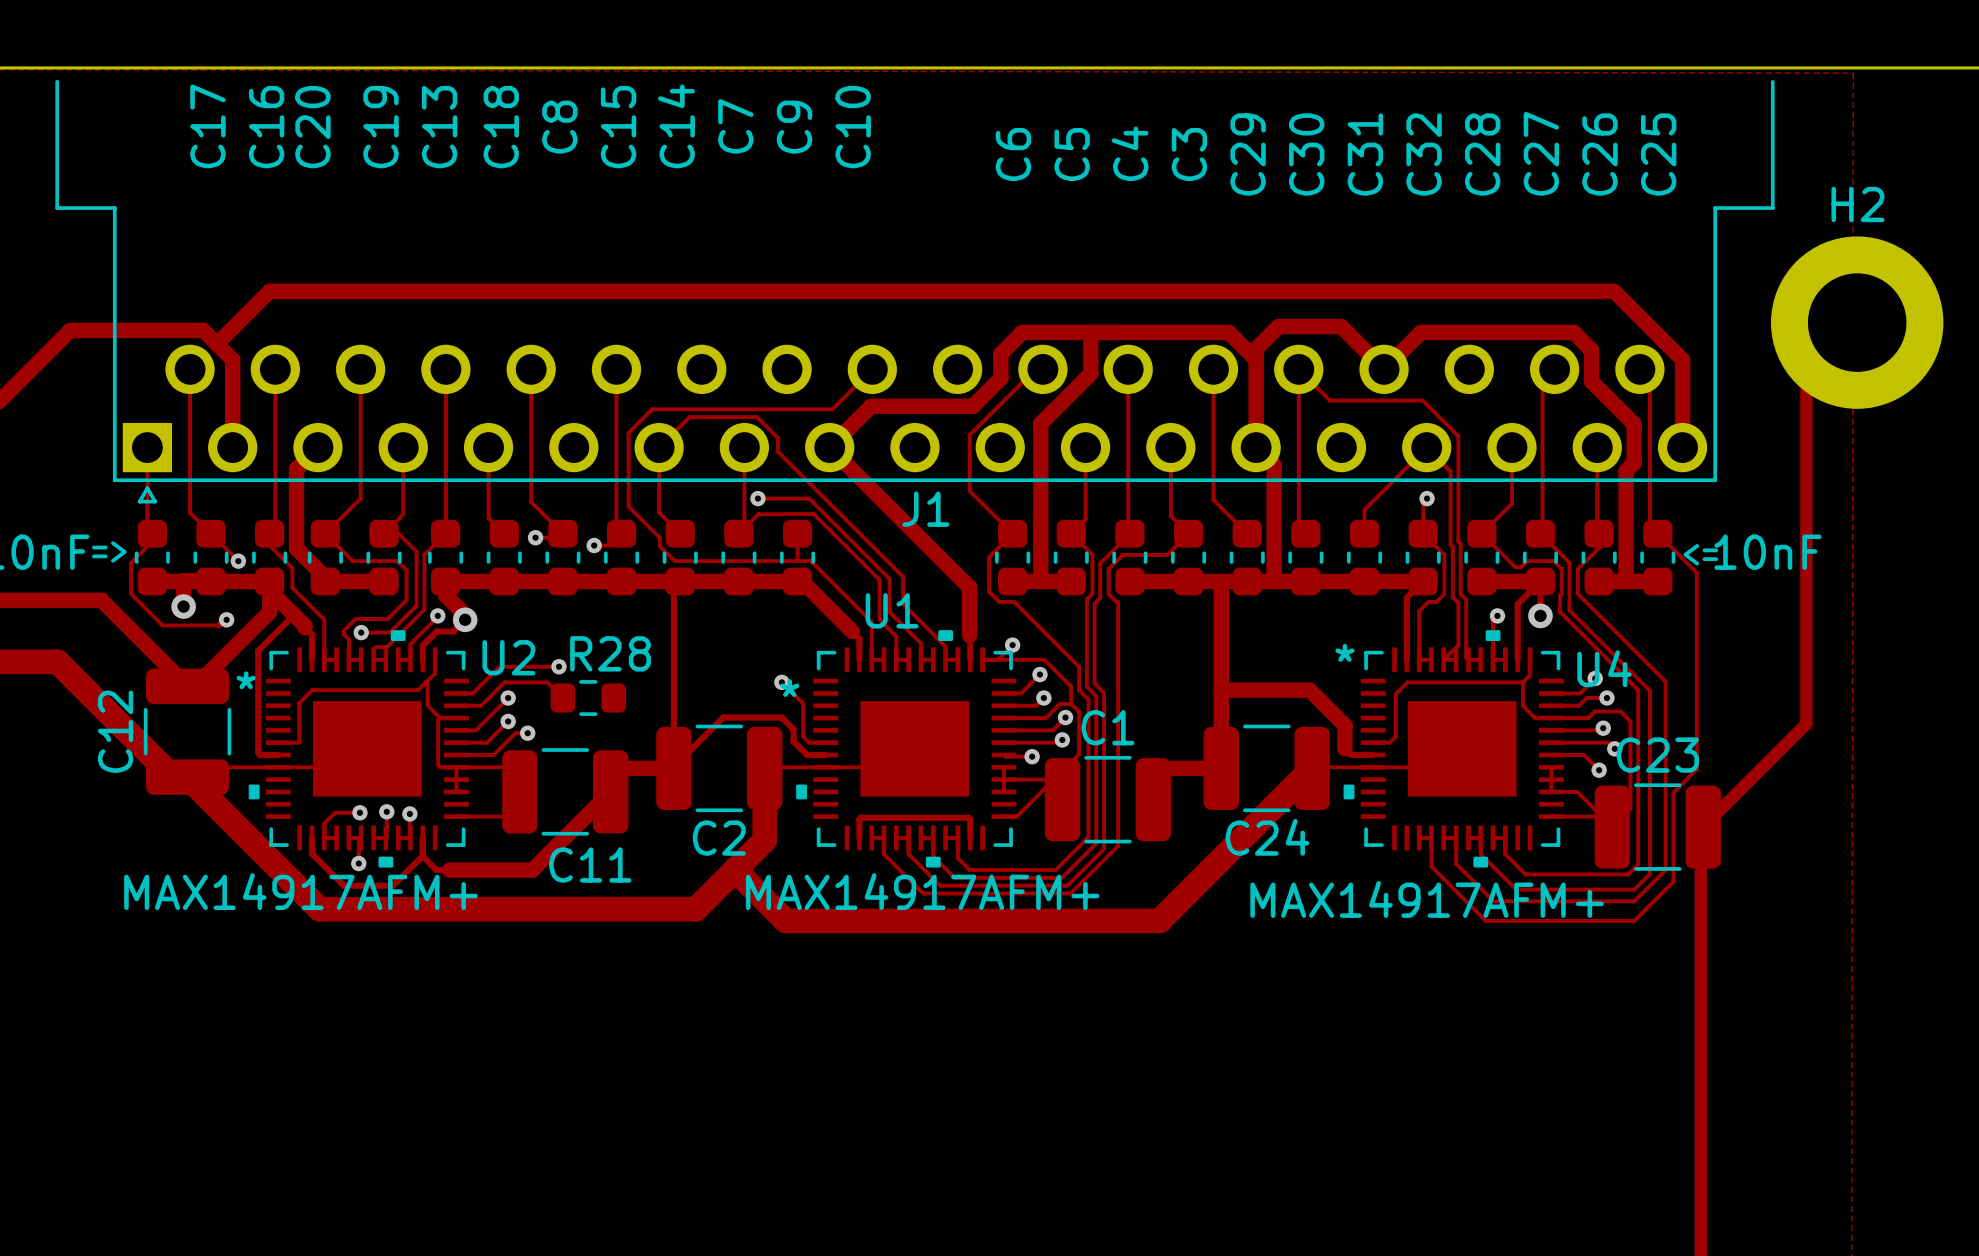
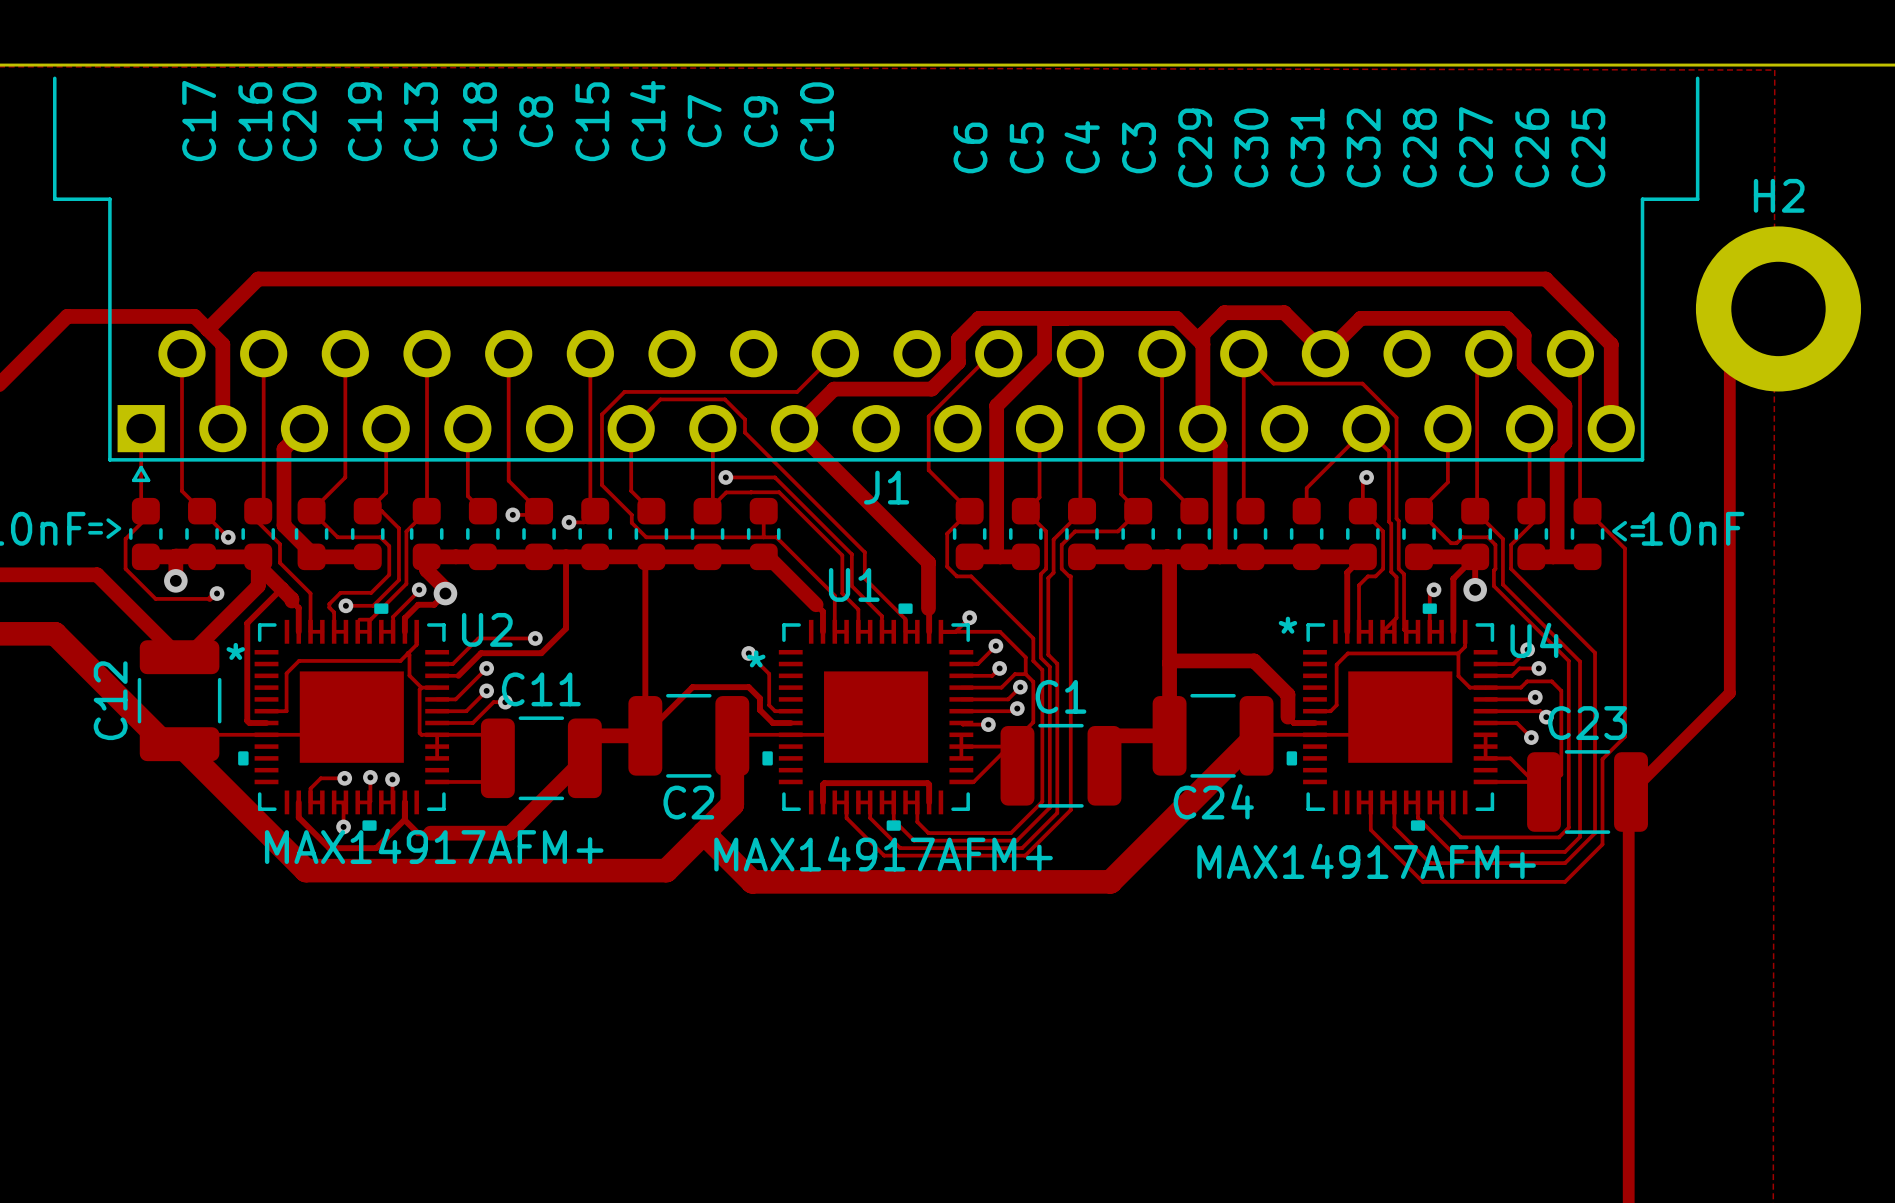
track: (562, 698) (547, 682) (504, 682) (481, 705) (478, 705) -> (566, 556) (566, 628) (541, 653) (481, 653) (458, 675)
R28: (588, 698) -> none
C11 name position: C11 (590, 865) -> C11 (541, 689)
U2 value position: MAX14917AFM+ (300, 891) -> MAX14917AFM+ (434, 846)

